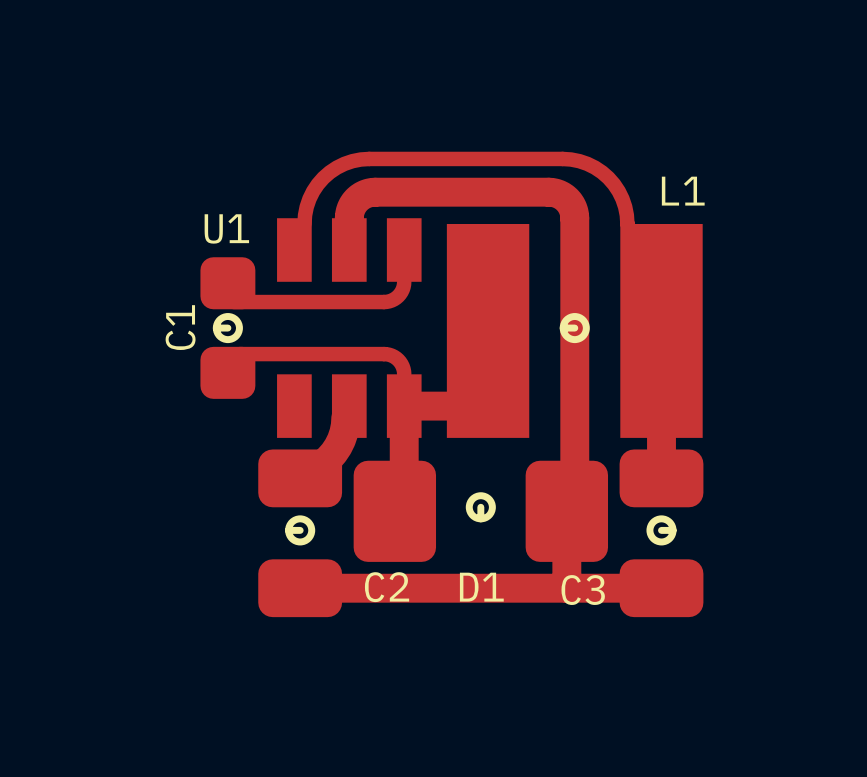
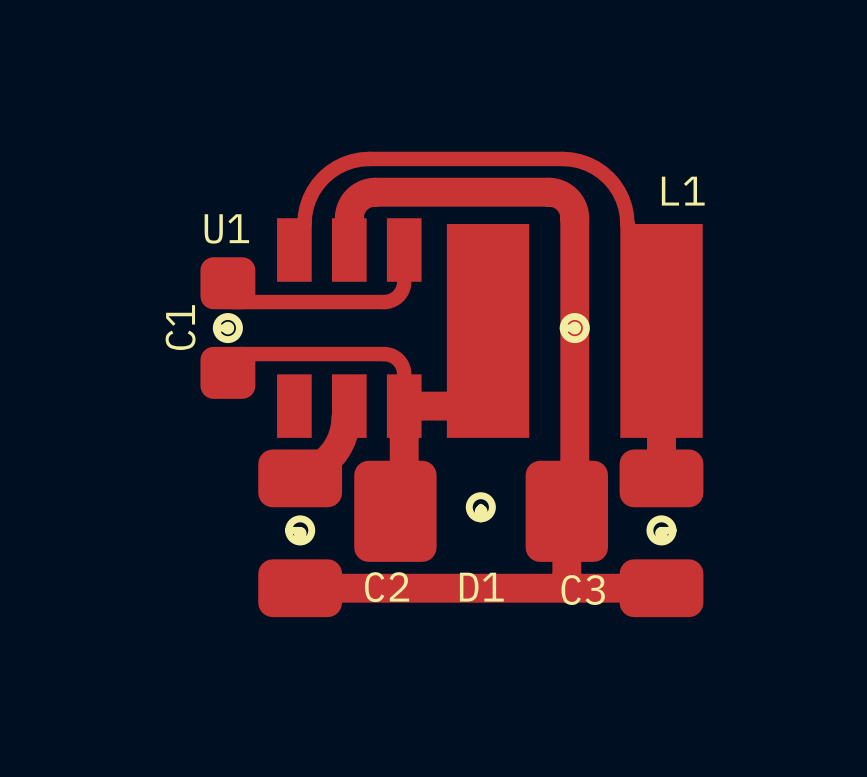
U1 footprint: [200, 151, 704, 618] -> [200, 151, 704, 618]

